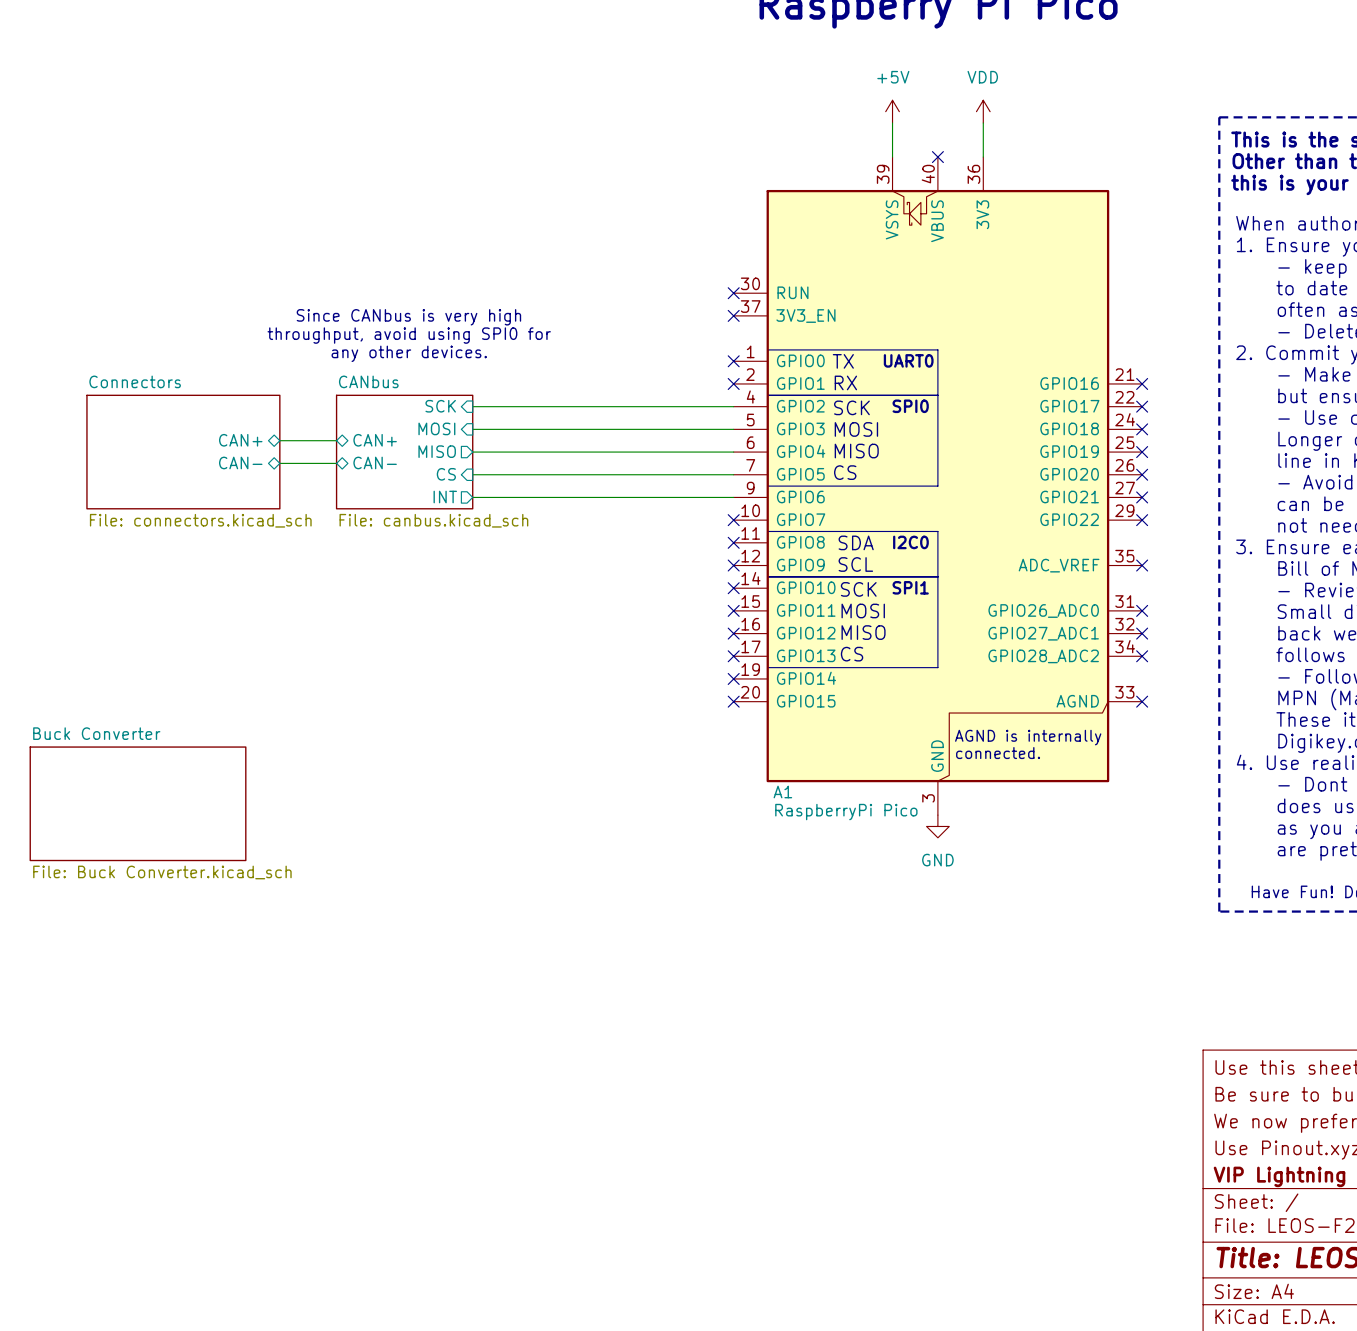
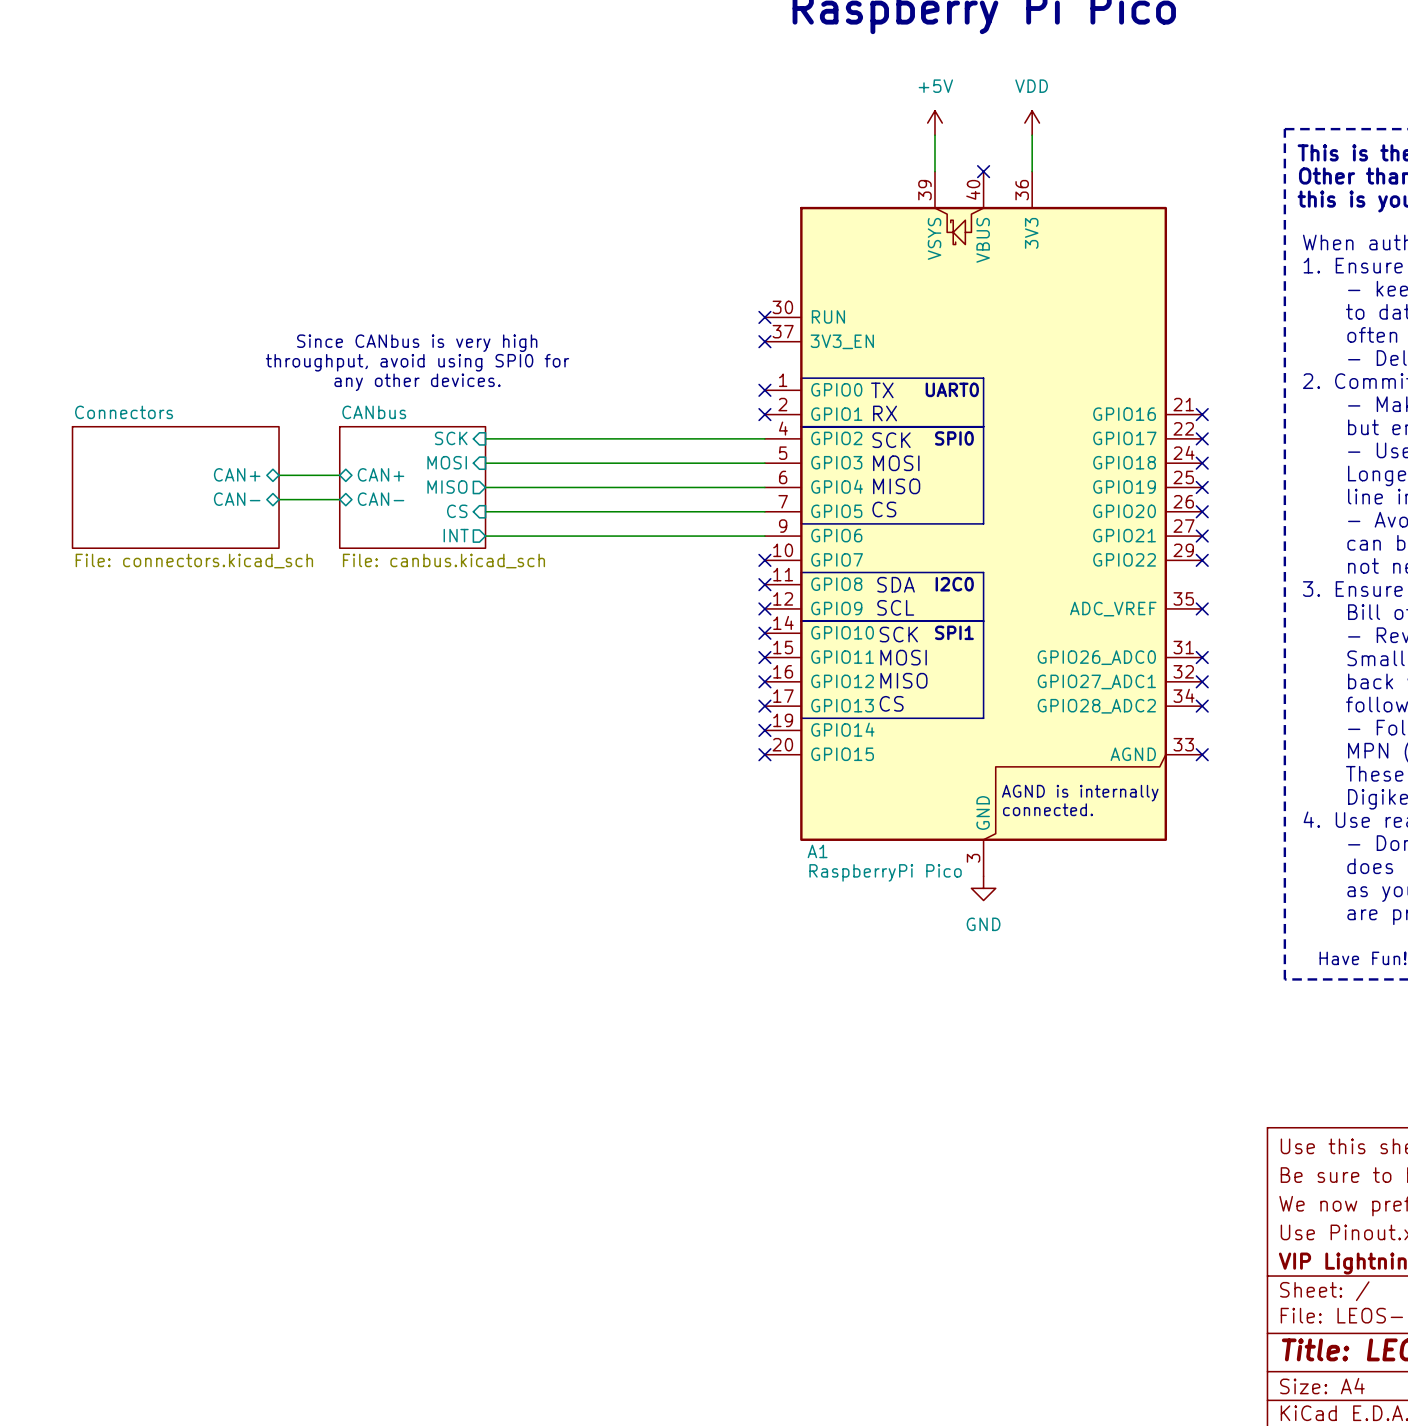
sheet Buck Converter: File: Buck Converter.kicad_sch (138, 803) -> none

